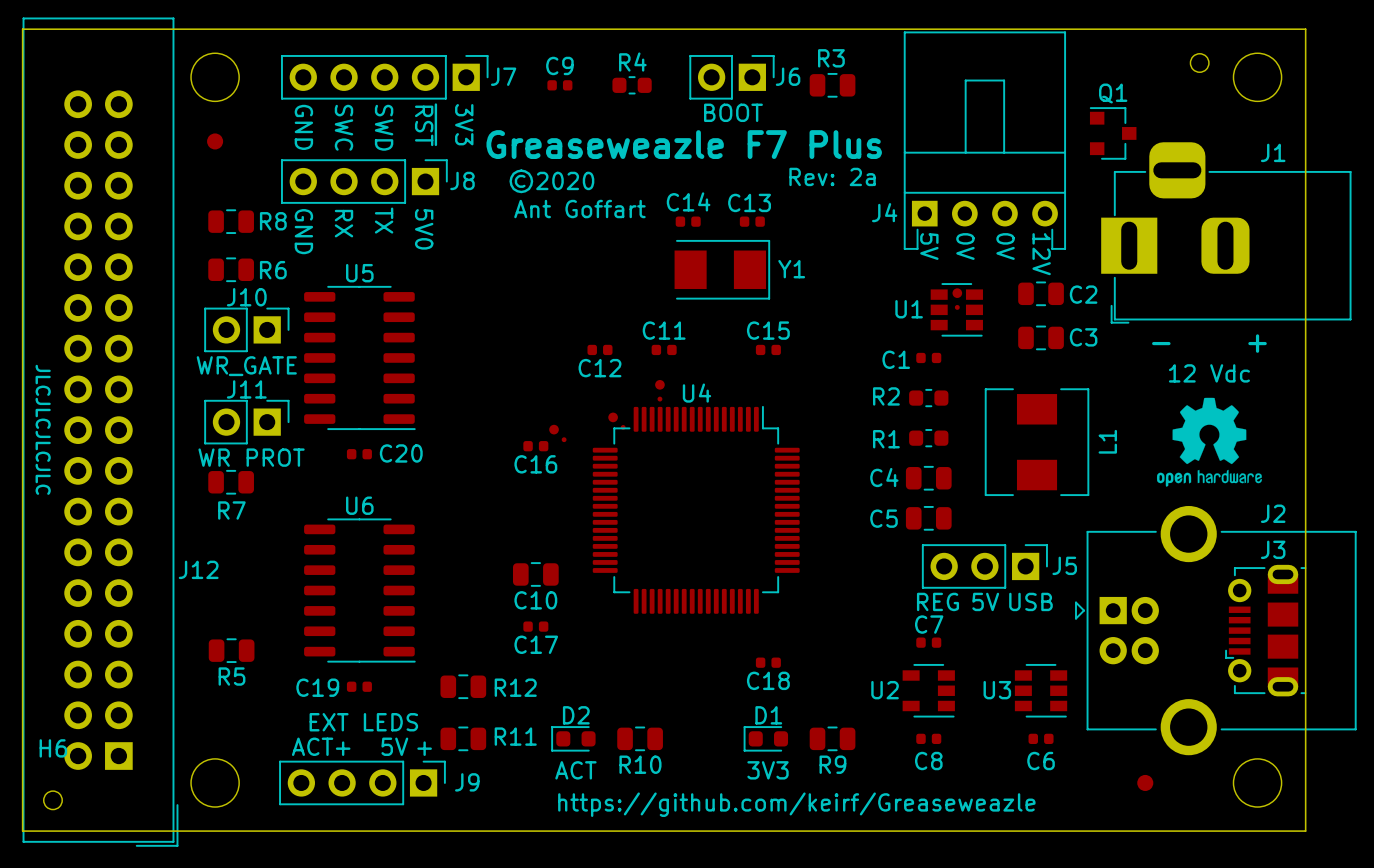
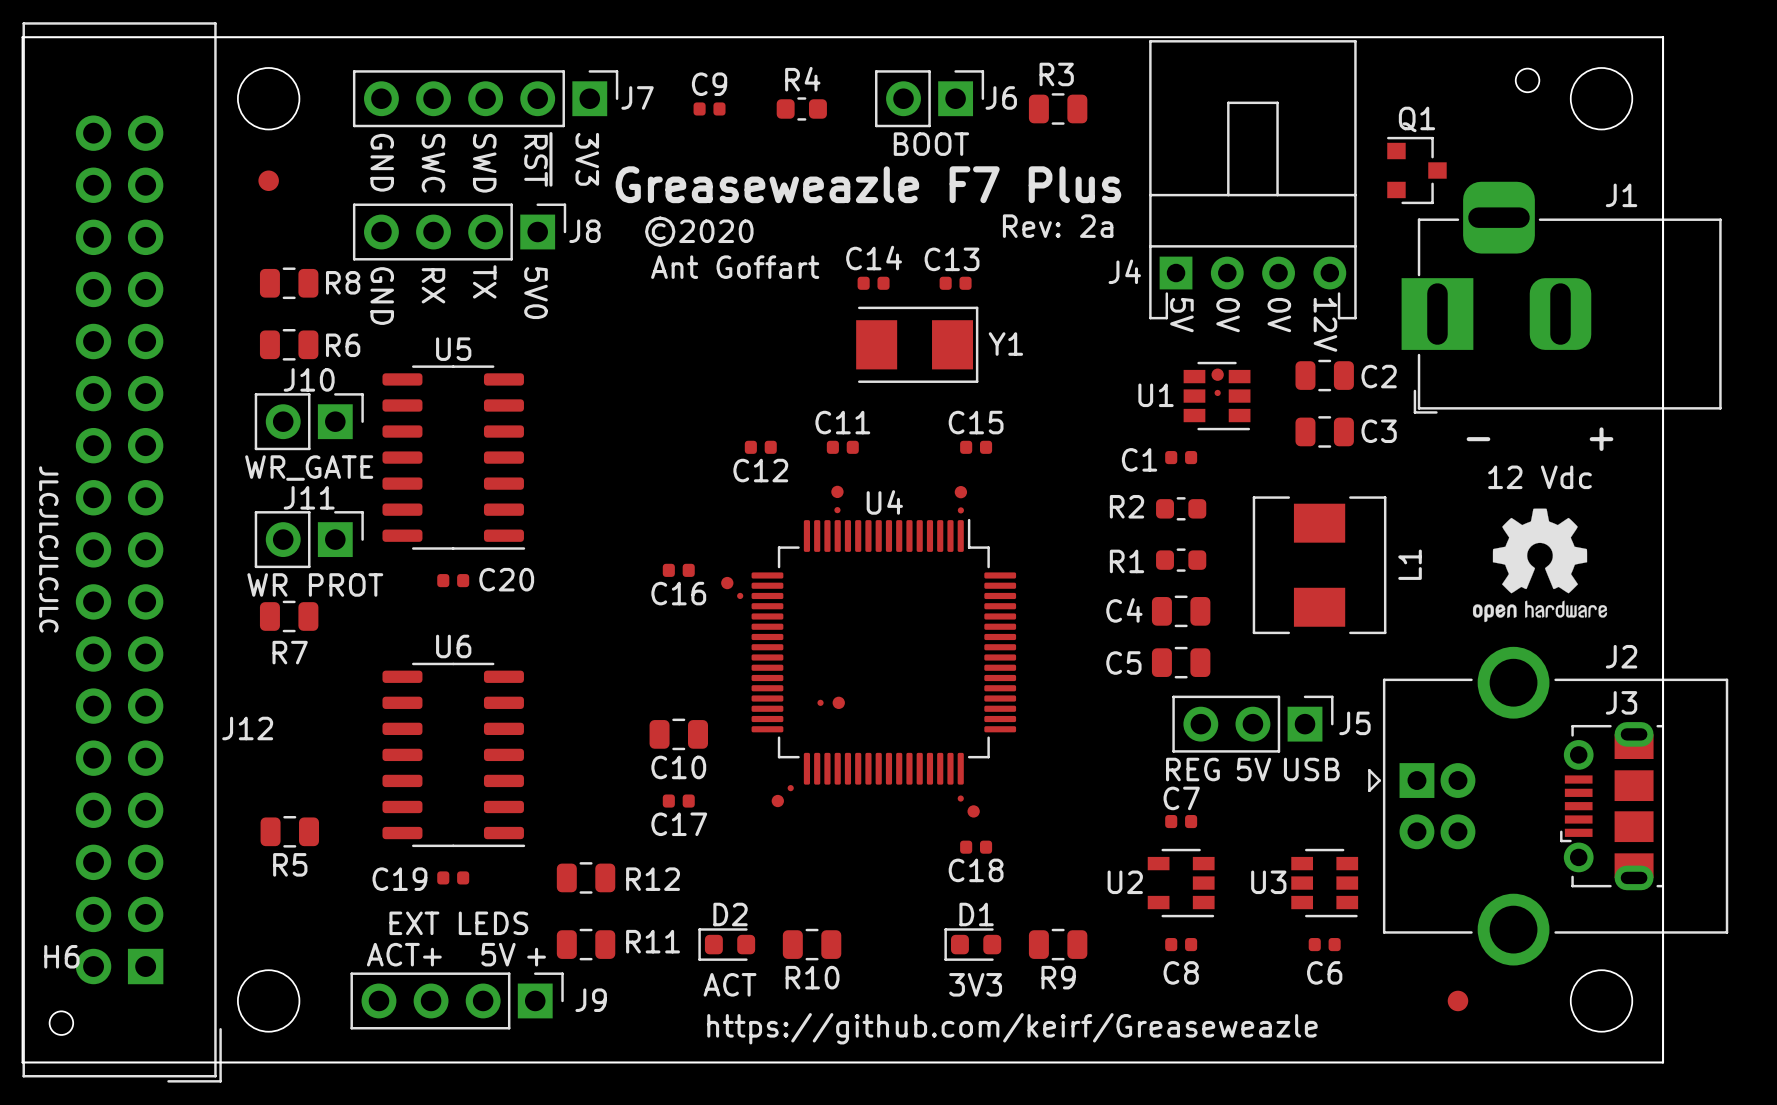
part: none -> (960, 499)
part: (616, 421) -> none
part: (557, 433) -> none
part: none -> (732, 587)
part: none -> (831, 702)
part: none -> (782, 796)
part: none -> (968, 806)

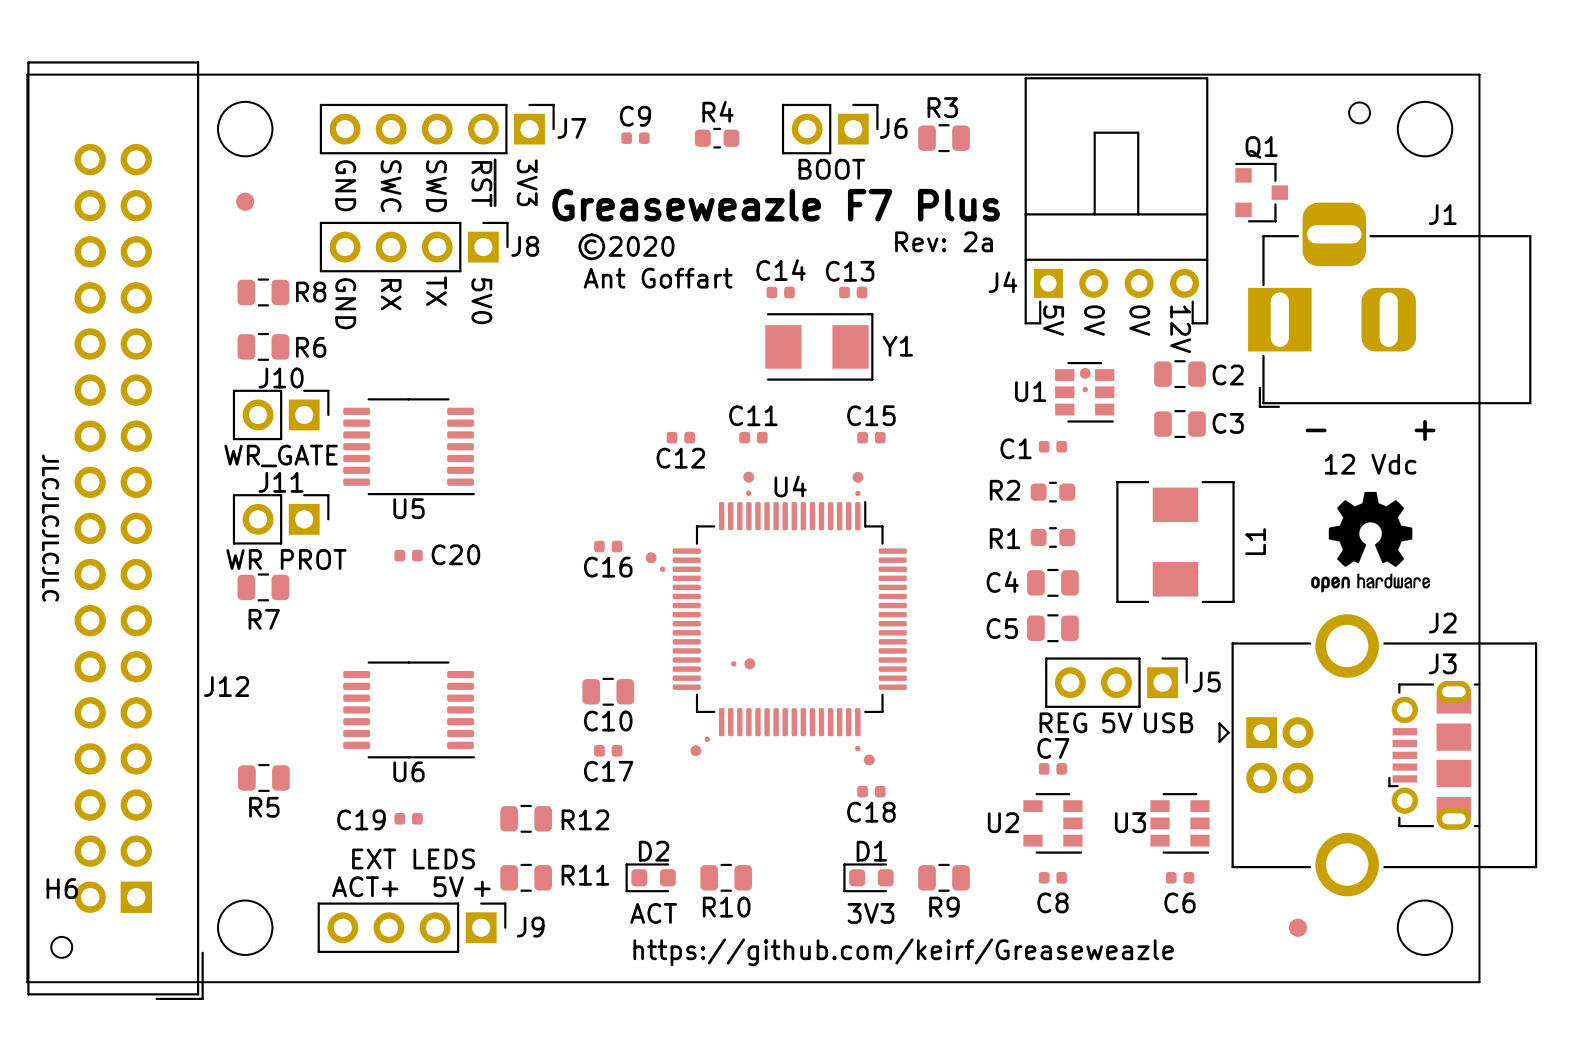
U5 name position: U5 (453, 349) -> U5 (409, 508)
U5 footprint: [382, 365, 526, 550] -> [343, 398, 476, 496]
U6 name position: U6 (453, 646) -> U6 (409, 771)
U6 footprint: [382, 662, 526, 848] -> [343, 661, 476, 759]

